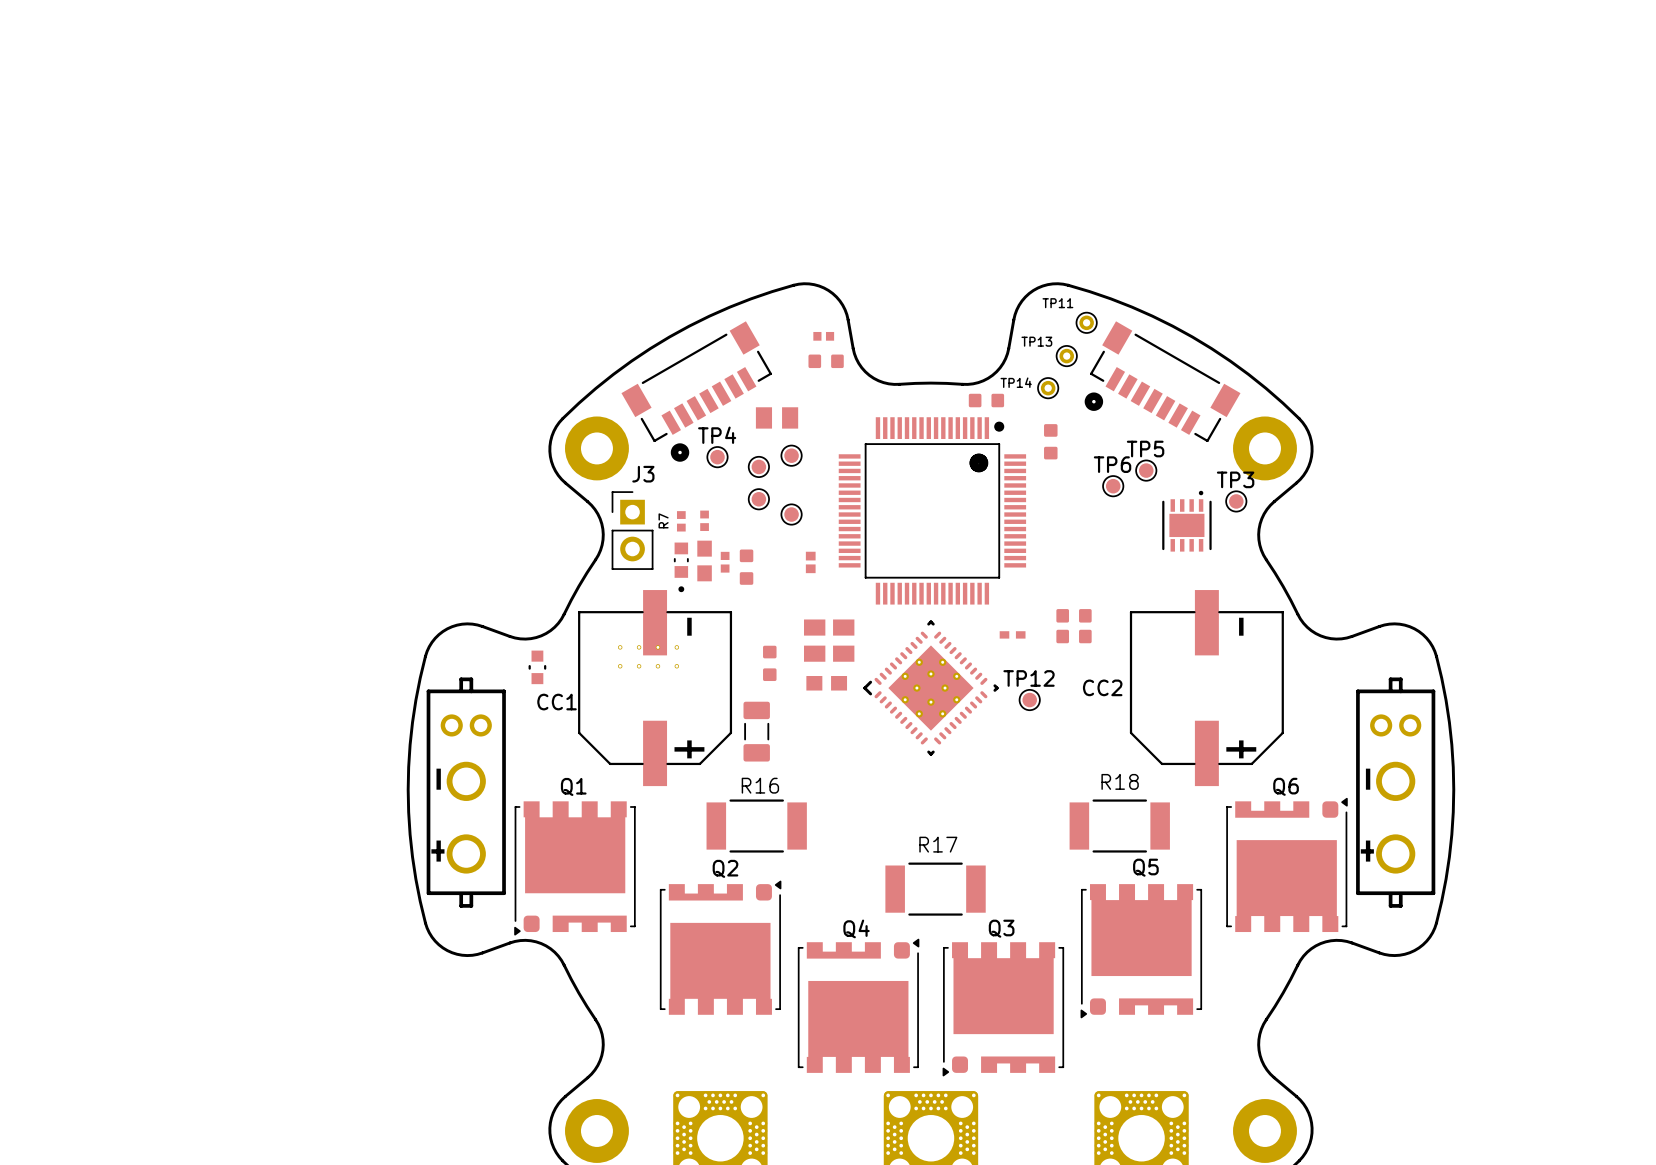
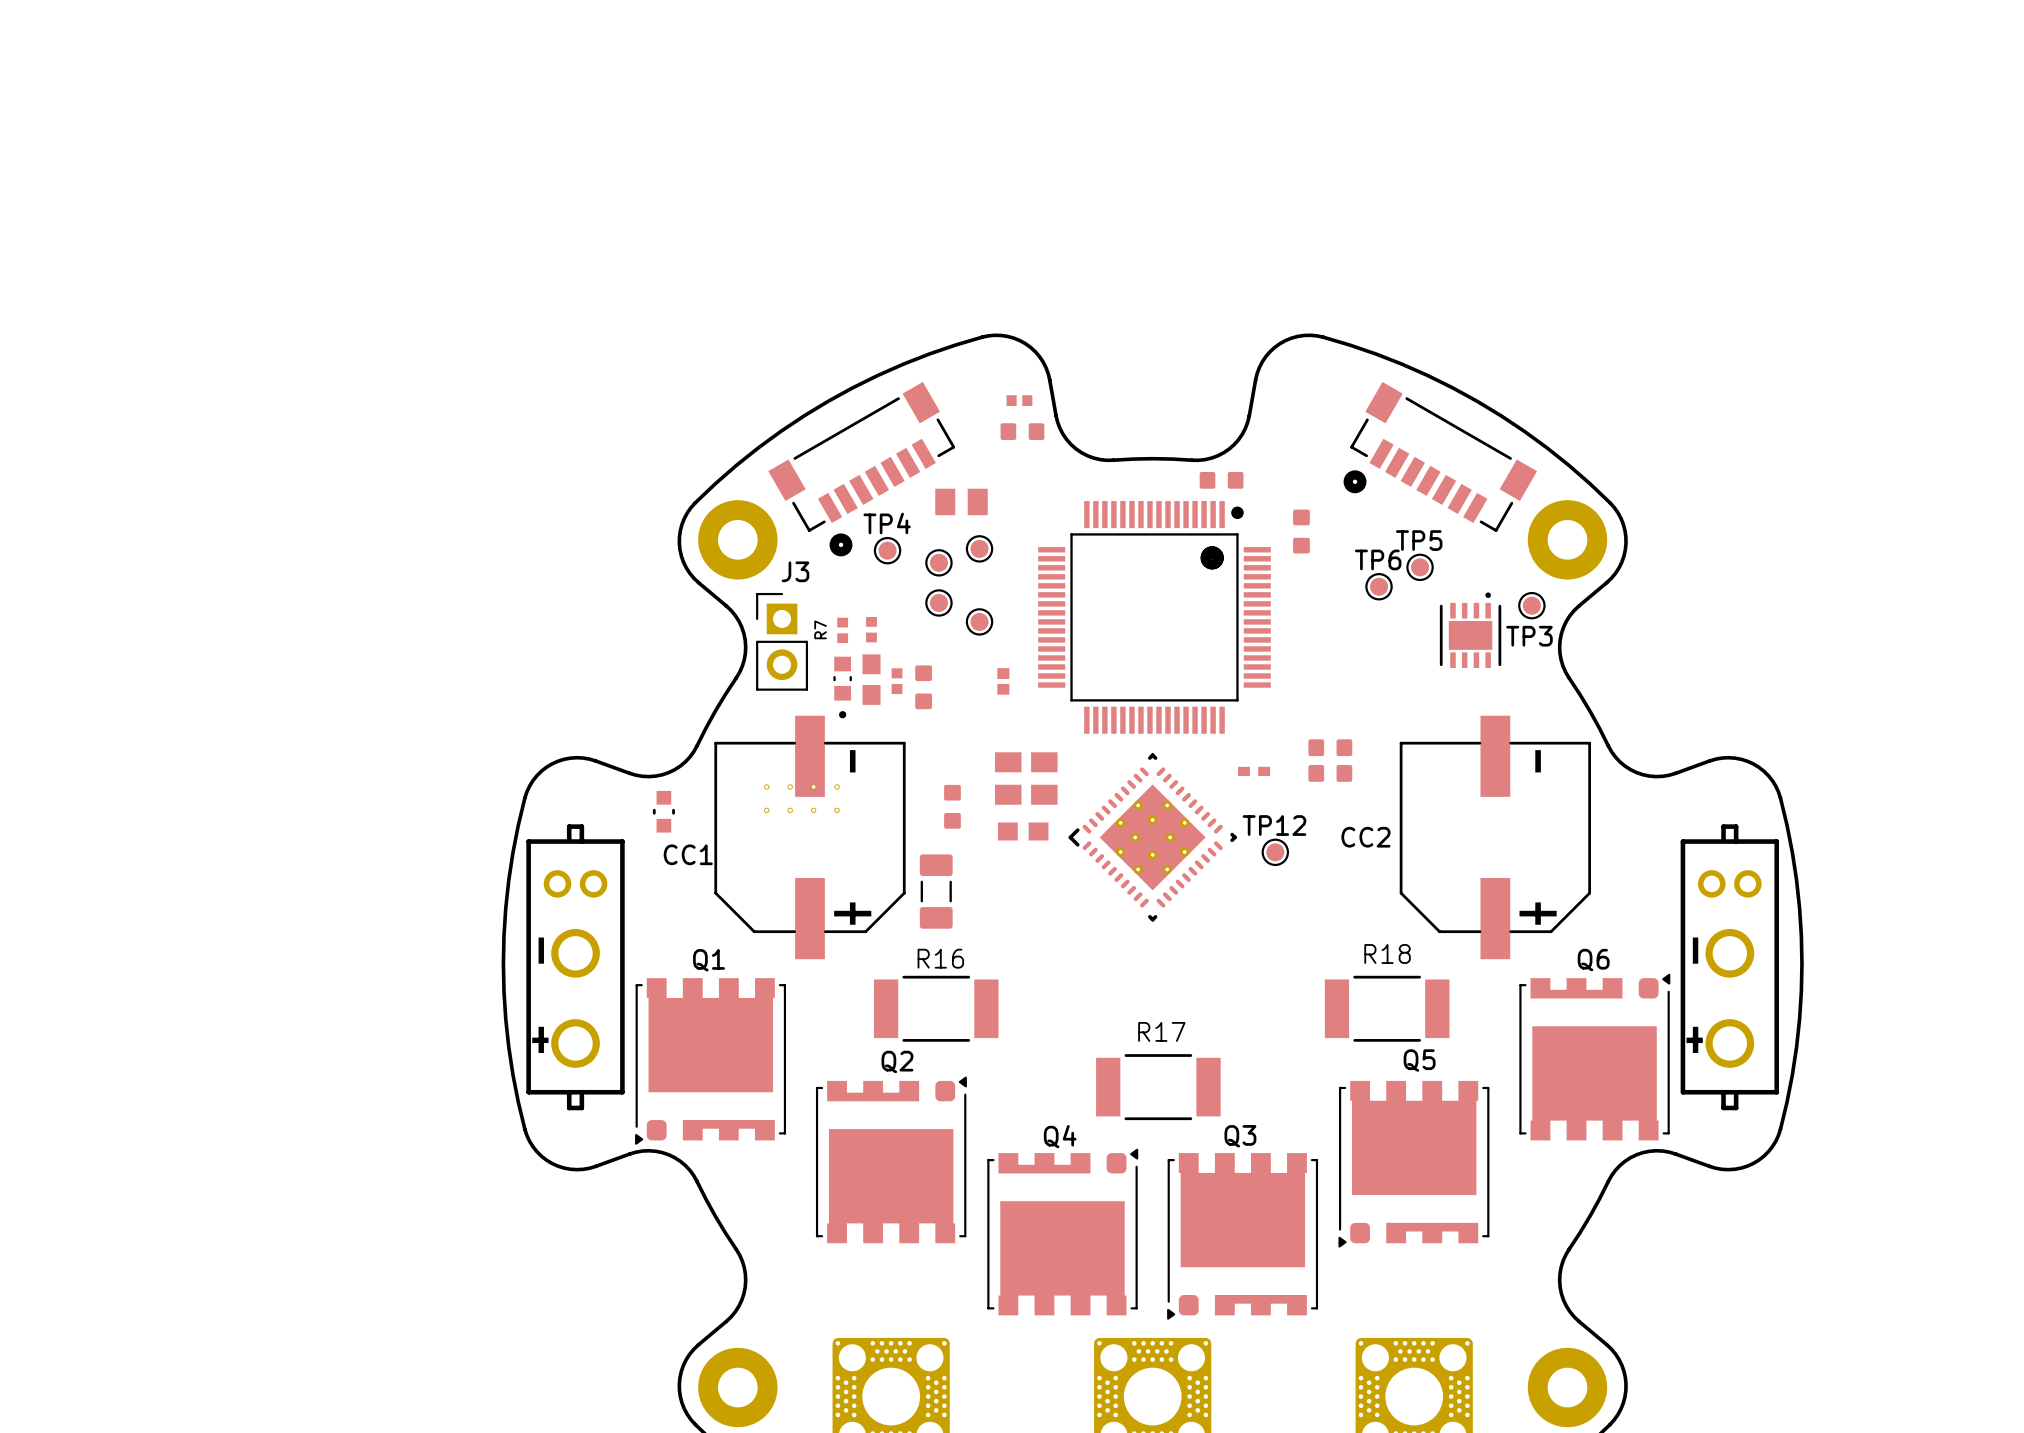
TP11: (1086, 322) -> none
TP13: (1066, 356) -> none
TP14: (1048, 388) -> none
TP3 name position: TP3 (1235, 479) -> TP3 (1529, 636)

